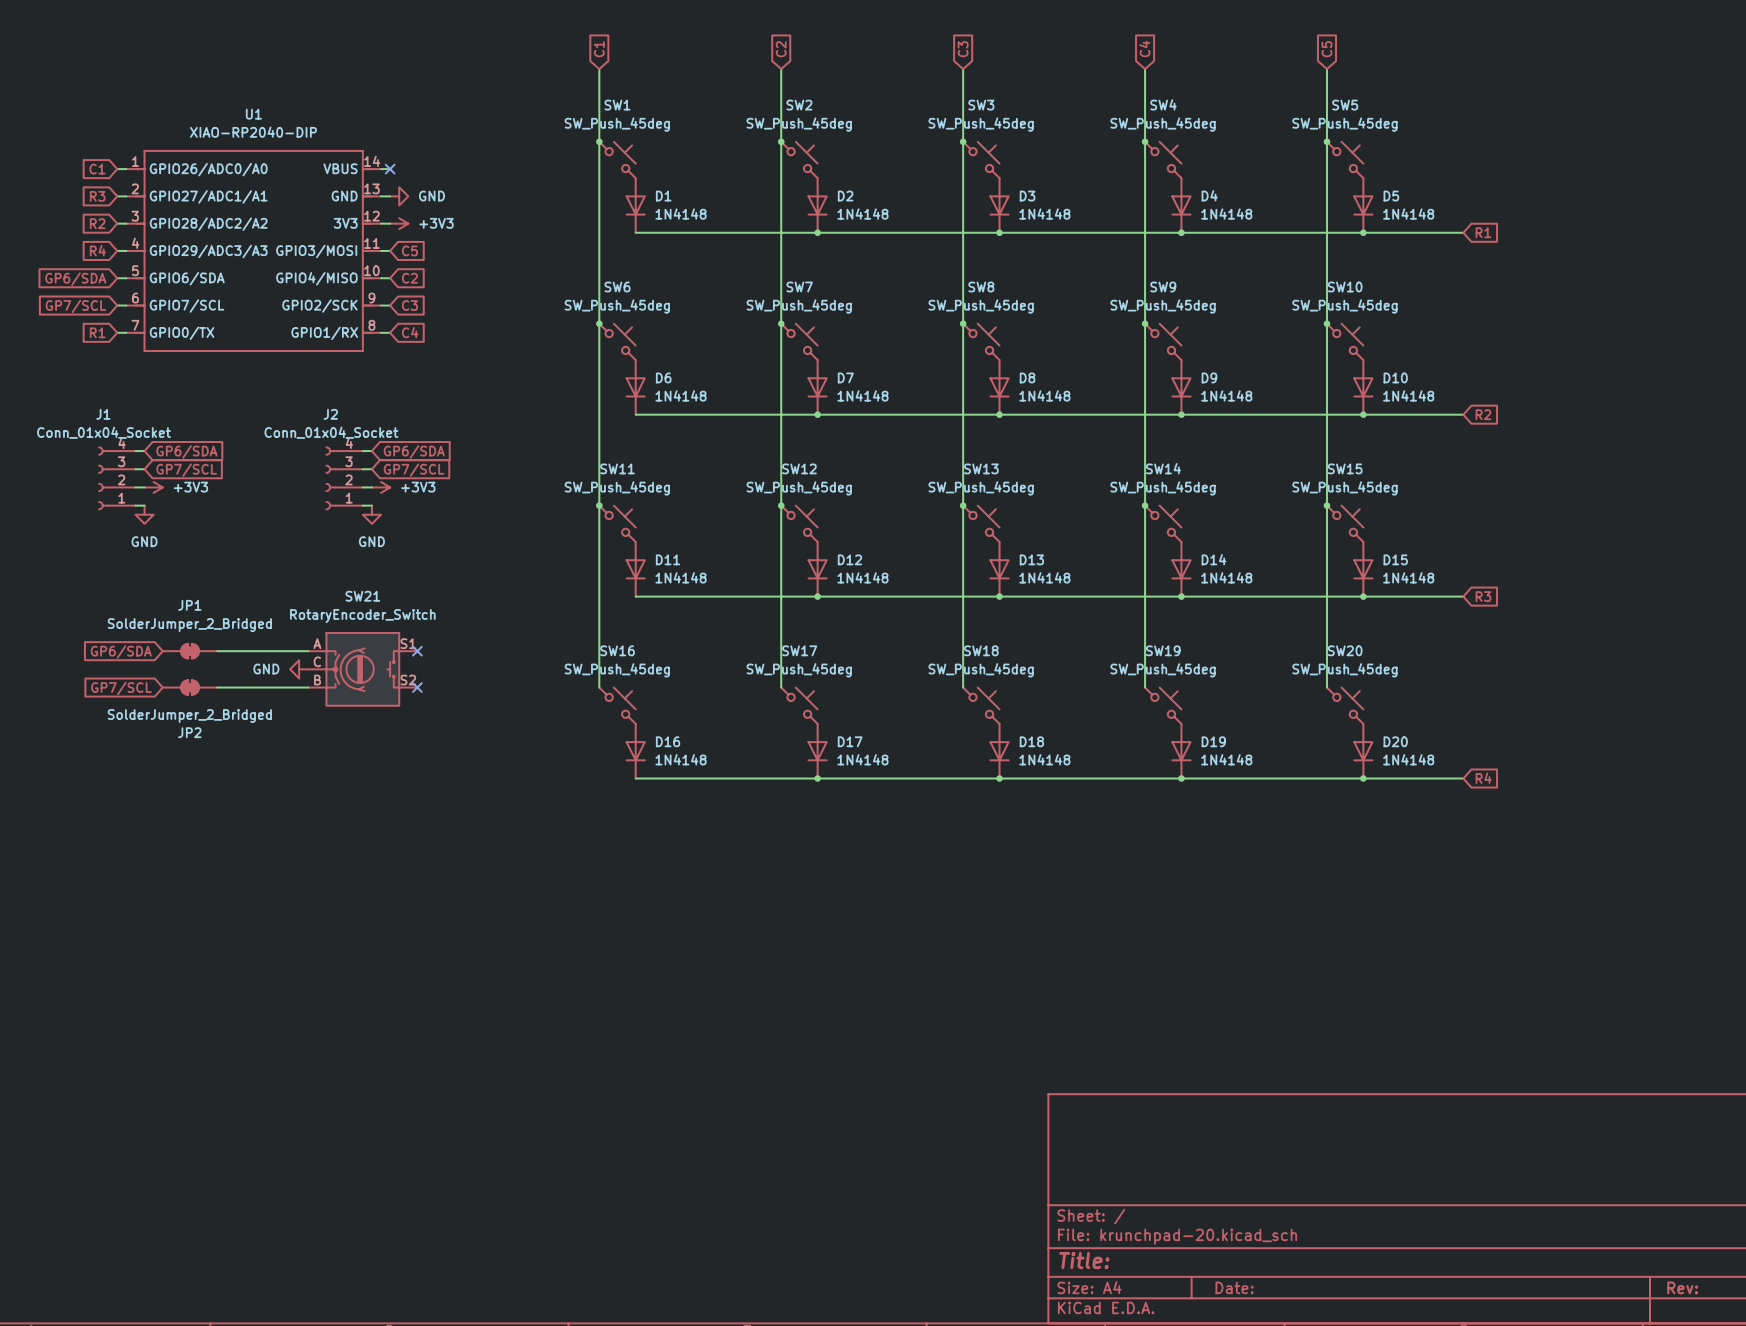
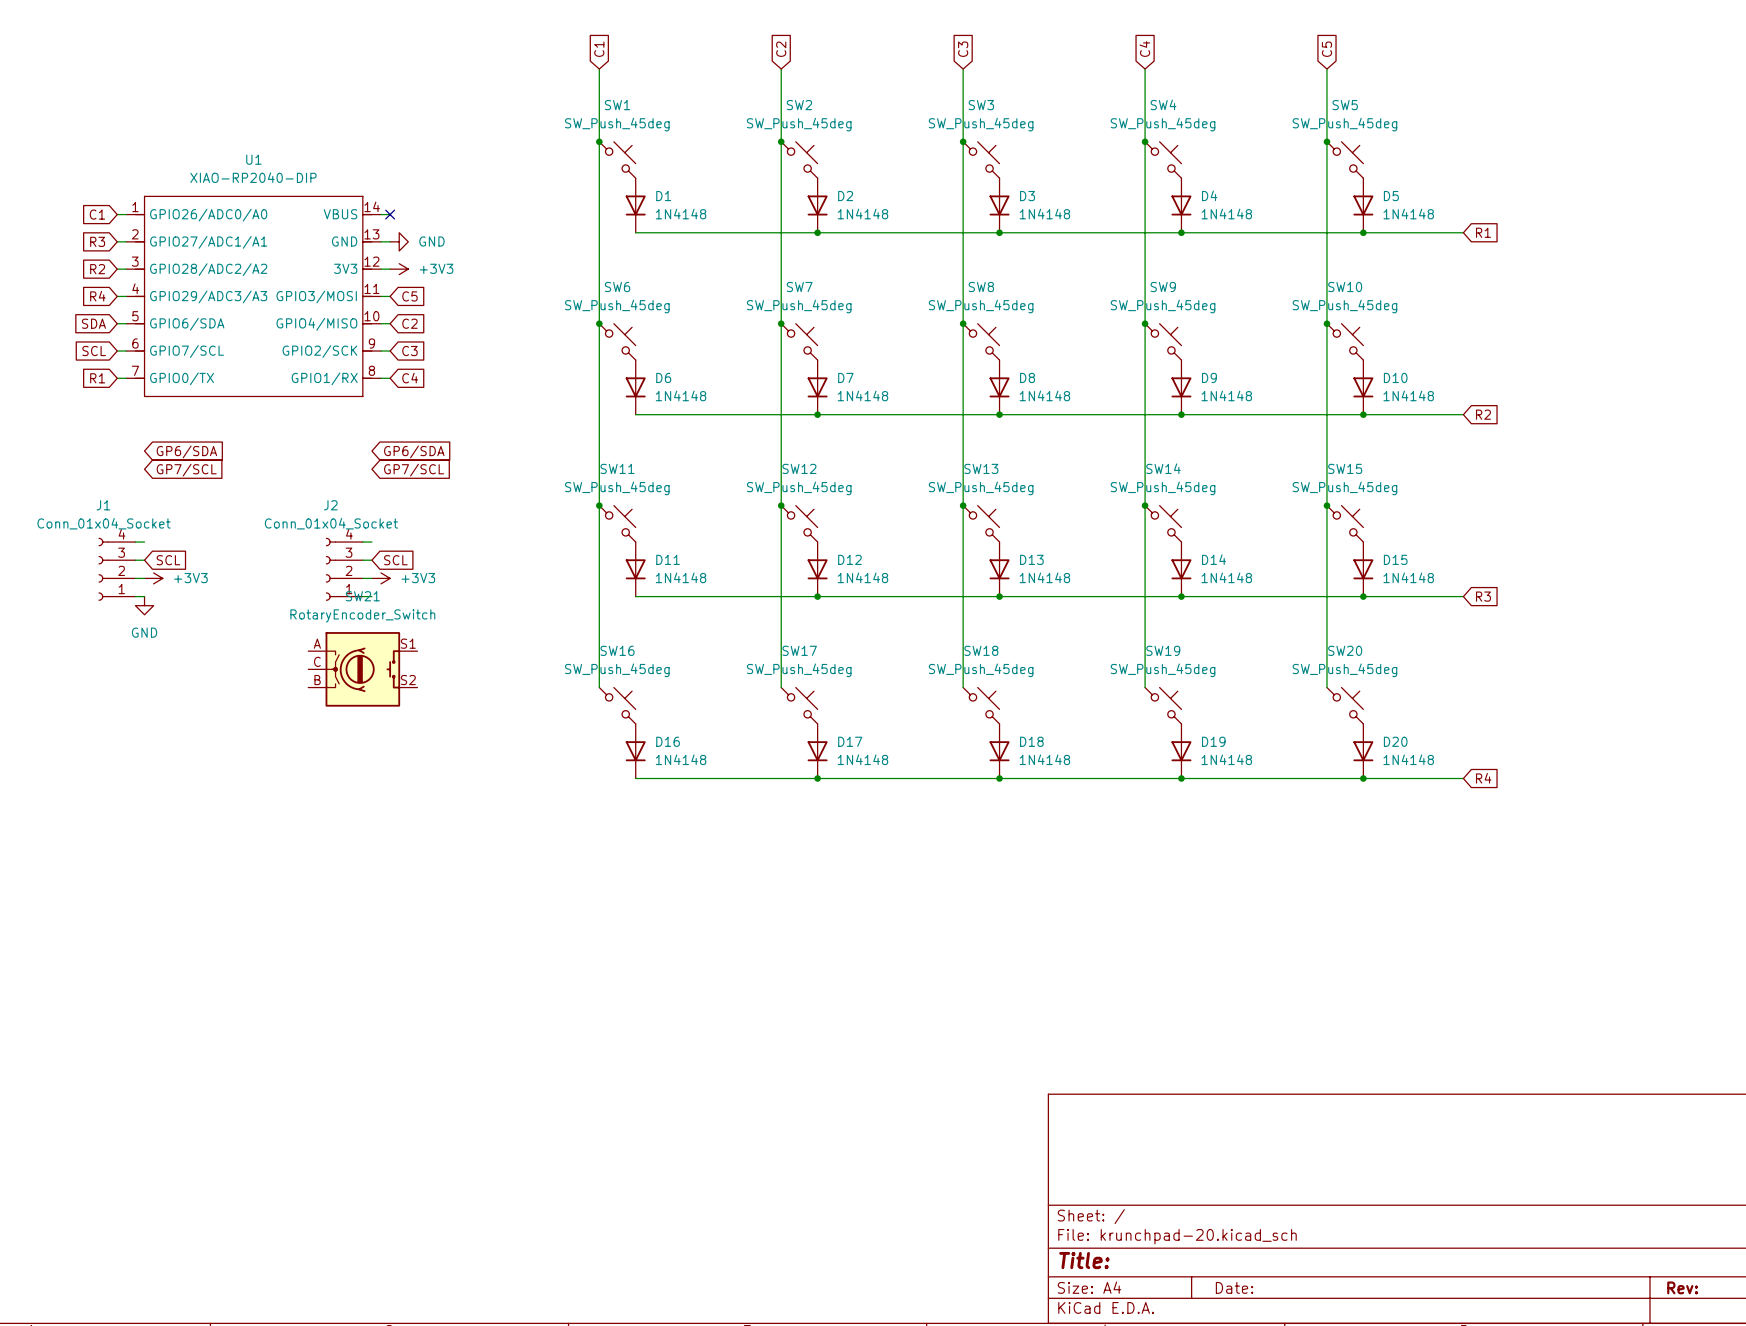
global label position: C1 (97, 169) -> C1 (97, 214)
wire: (117, 169) (126, 169) -> (117, 241) (126, 241)
wire: (381, 169) (390, 169) -> (381, 241) (390, 241)
no-connect mark: (390, 169) -> none
global label position: R3 (97, 196) -> R3 (97, 241)
wire: (117, 196) (126, 196) -> (117, 269) (126, 269)
wire: (381, 196) (390, 196) -> (381, 269) (390, 269)
power symbol position: GND (399, 196) -> GND (399, 241)
no-connect mark: none -> (390, 214)
global label position: R2 (97, 223) -> R2 (97, 269)
wire: (117, 223) (126, 223) -> (117, 296) (126, 296)
wire: (381, 223) (390, 223) -> (381, 296) (390, 296)
power symbol position: +3V3 (399, 223) -> +3V3 (399, 269)
global label position: R4 (97, 250) -> R4 (97, 296)
wire: (117, 250) (126, 250) -> (117, 323) (126, 323)
U1 position: (253, 250) -> (253, 296)
wire: (381, 250) (390, 250) -> (381, 323) (390, 323)
global label position: C5 (409, 250) -> C5 (409, 296)
wire: (117, 278) (126, 278) -> (117, 351) (126, 351)
wire: (381, 278) (390, 278) -> (381, 351) (390, 351)
global label position: C2 (409, 278) -> C2 (409, 323)
global label: GP6/SDA (75, 279) -> none
wire: (117, 305) (126, 305) -> (117, 378) (126, 378)
wire: (381, 305) (390, 305) -> (381, 378) (390, 378)
global label position: C3 (409, 305) -> C3 (409, 351)
global label: GP7/SCL (75, 306) -> none
global label: none -> SDA (93, 323)
global label position: R1 (97, 332) -> R1 (97, 378)
wire: (117, 332) (126, 332) -> (117, 214) (126, 214)
wire: (381, 332) (390, 332) -> (381, 214) (390, 214)
global label position: C4 (410, 332) -> C4 (410, 378)
global label: none -> SCL (94, 351)
wire: (135, 451) (144, 451) -> (135, 596) (144, 596)
wire: (362, 451) (371, 451) -> (362, 596) (371, 596)
wire: (135, 469) (144, 469) -> (135, 542) (144, 542)
wire: (362, 469) (371, 469) -> (362, 542) (371, 542)
J1 position: (116, 478) -> (116, 569)
J2 position: (344, 478) -> (344, 569)
wire: (135, 487) (144, 487) -> (135, 560) (144, 560)
power symbol position: +3V3 (153, 487) -> +3V3 (153, 578)
wire: (362, 487) (371, 487) -> (362, 560) (371, 560)
power symbol position: +3V3 (381, 487) -> +3V3 (381, 578)
wire: (135, 505) (144, 505) -> (135, 578) (144, 578)
wire: (362, 505) (371, 505) -> (362, 578) (371, 578)
power symbol: GND (144, 514) -> none
power symbol: GND (371, 514) -> none
global label: none -> SCL (168, 560)
global label: none -> SCL (395, 560)
power symbol: none -> GND (144, 605)
JP1: SolderJumper_2_Bridged (190, 651) -> none
wire: (217, 651) (308, 651) -> none
no-connect mark: (417, 651) -> none
global label: GP6/SDA (121, 652) -> none
power symbol: GND (299, 669) -> none
JP2: SolderJumper_2_Bridged (190, 687) -> none
wire: (217, 687) (308, 687) -> none
no-connect mark: (417, 687) -> none
global label: GP7/SCL (121, 688) -> none

